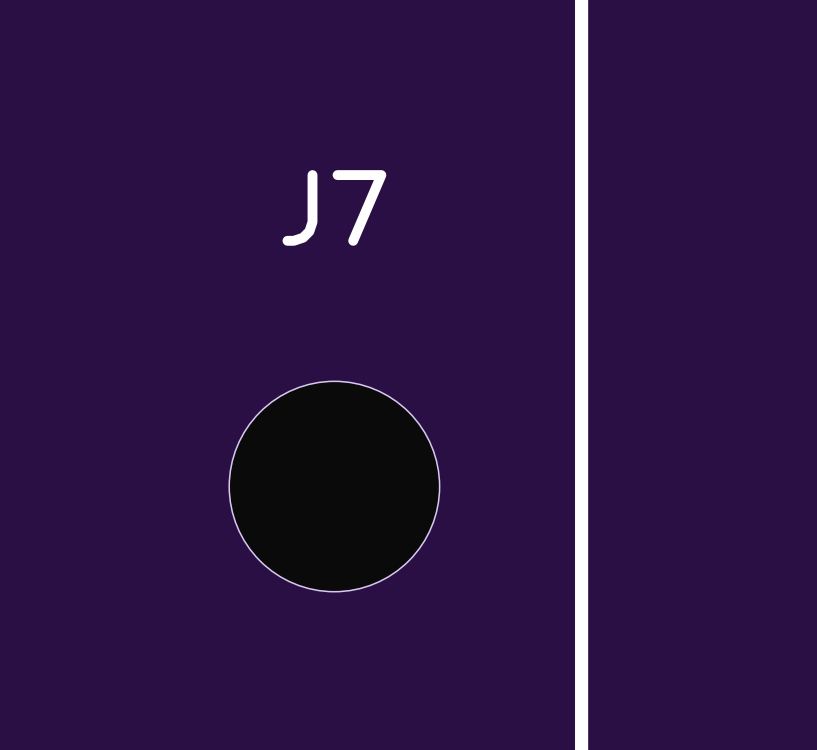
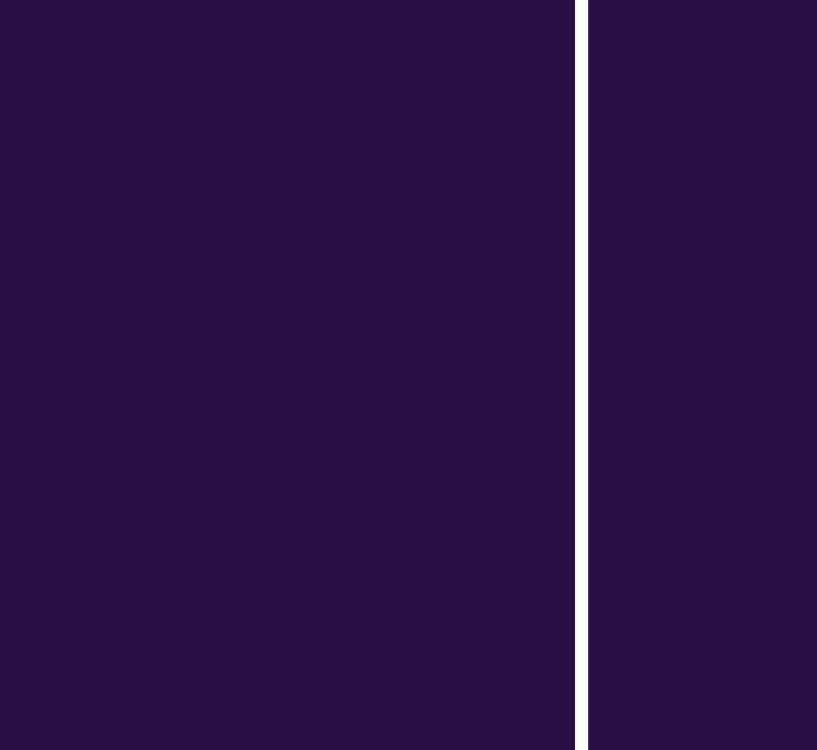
J7: (334, 486) -> none

